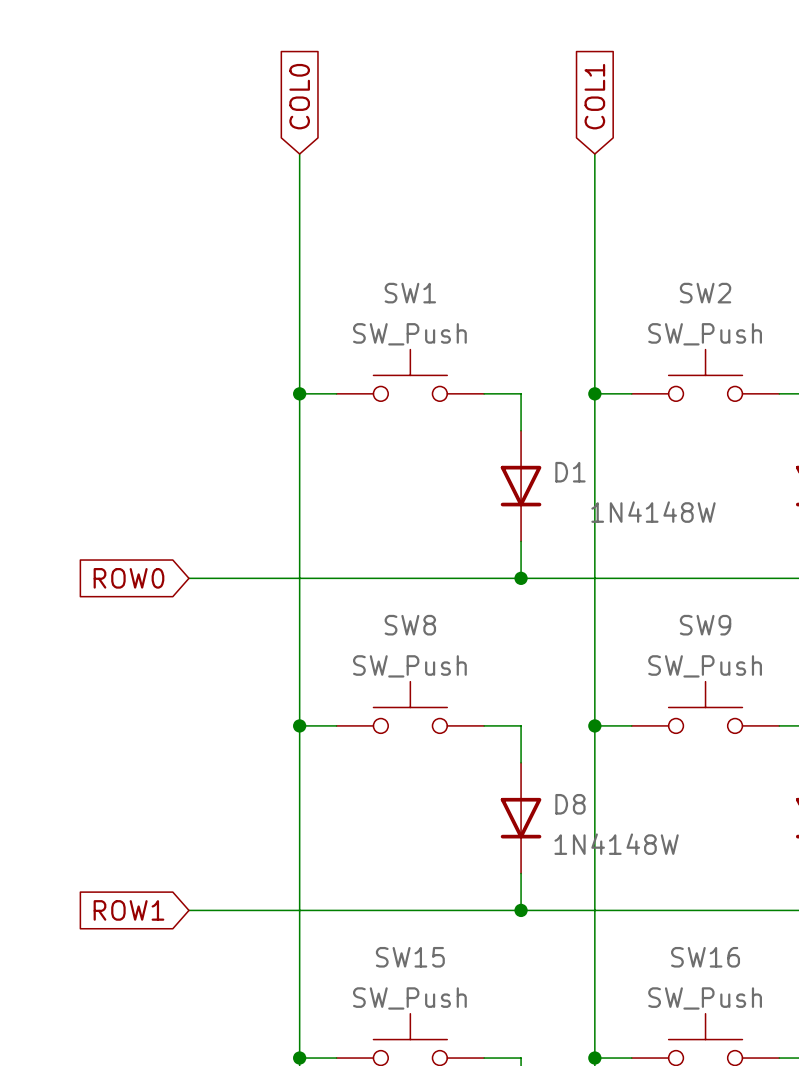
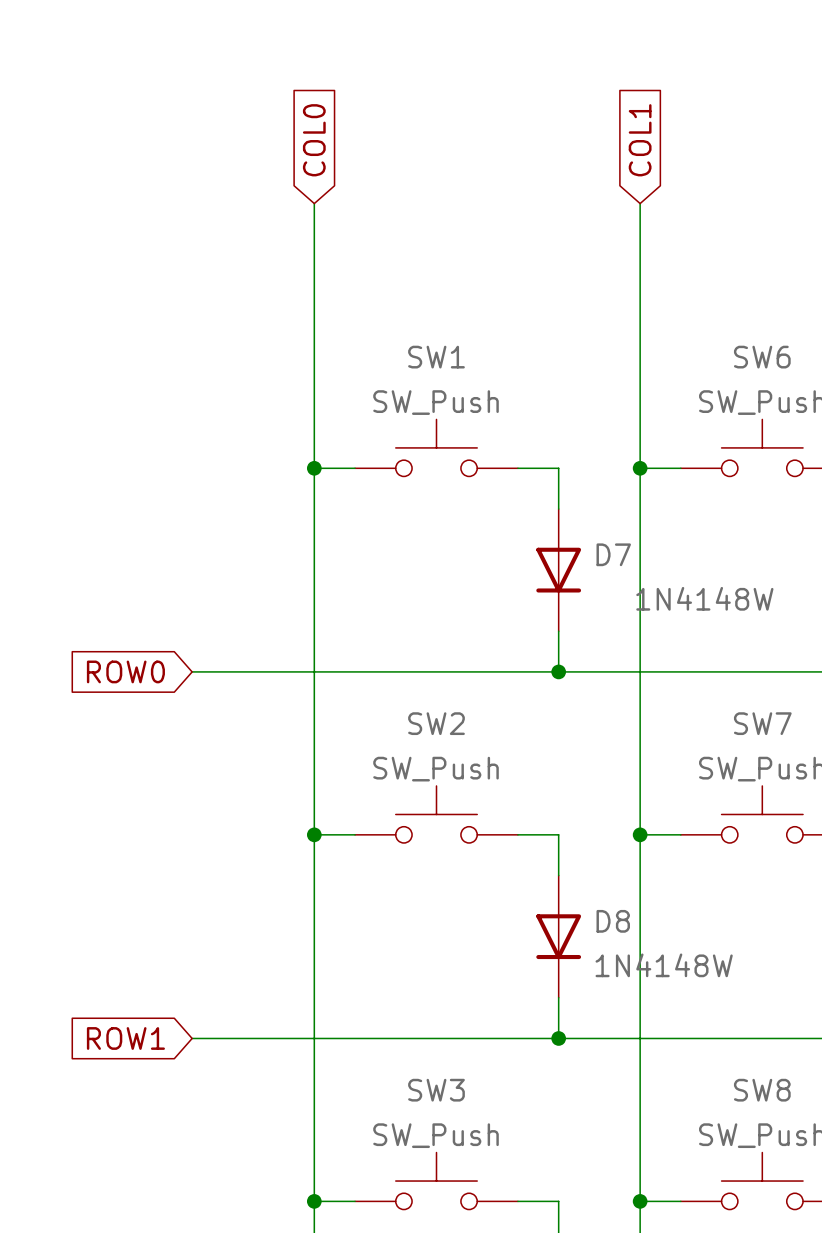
SW2 name: SW2 (705, 293) -> SW6 (762, 357)
D1 name: D1 (570, 472) -> D7 (613, 554)
SW8 name: SW8 (410, 625) -> SW2 (436, 723)
SW9 name: SW9 (705, 625) -> SW7 (762, 723)
SW15 name: SW15 (410, 957) -> SW3 (436, 1090)
SW16 name: SW16 (705, 957) -> SW8 (762, 1090)

